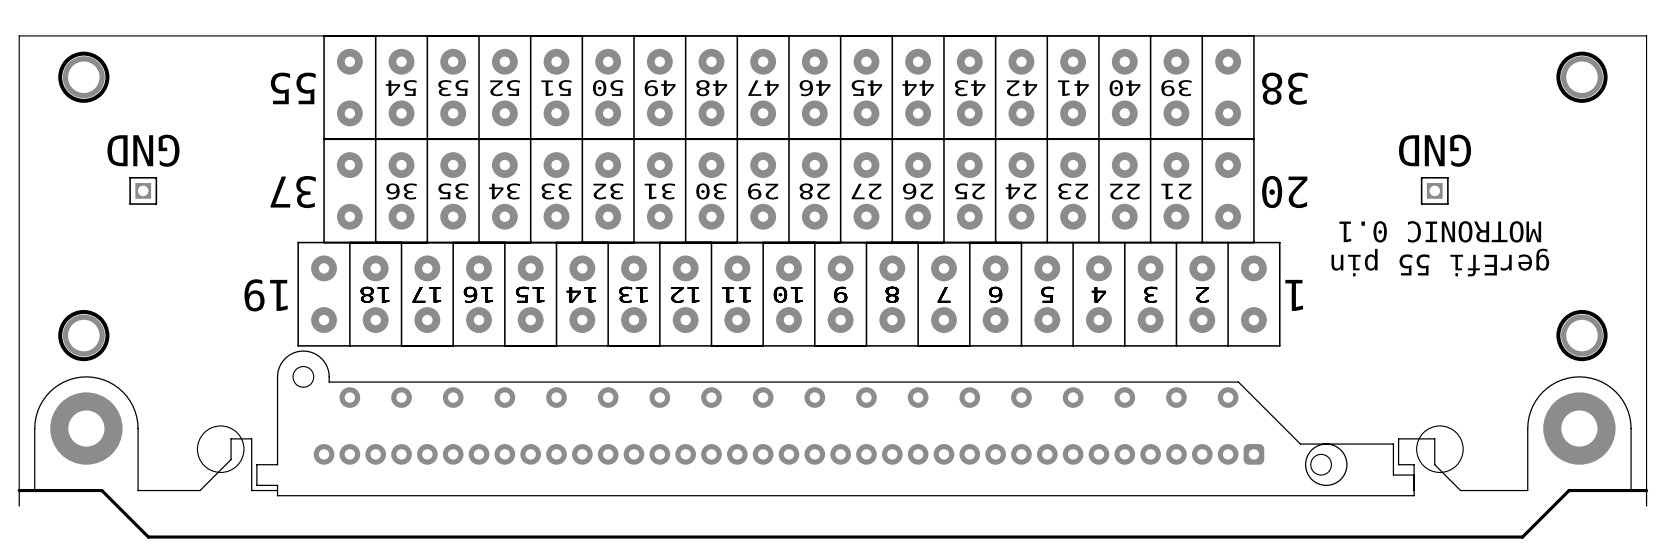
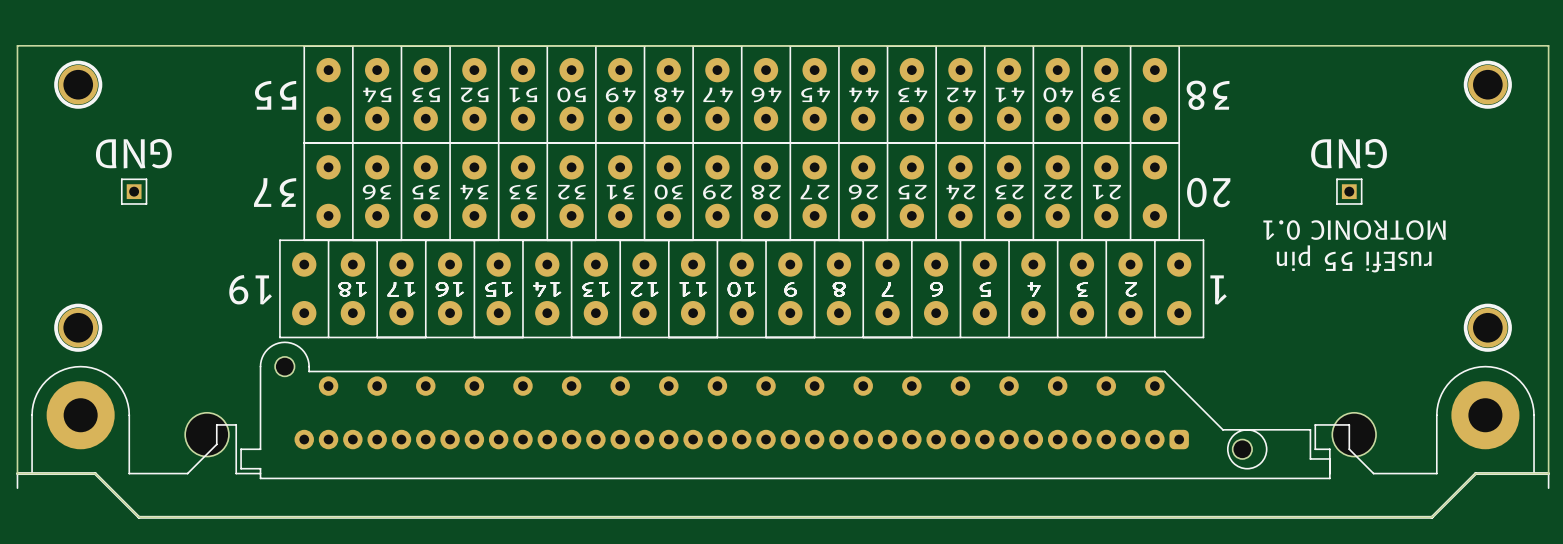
text: gerEfi 55 pin (1440, 262) -> rusEfi 55 pin (1354, 258)

